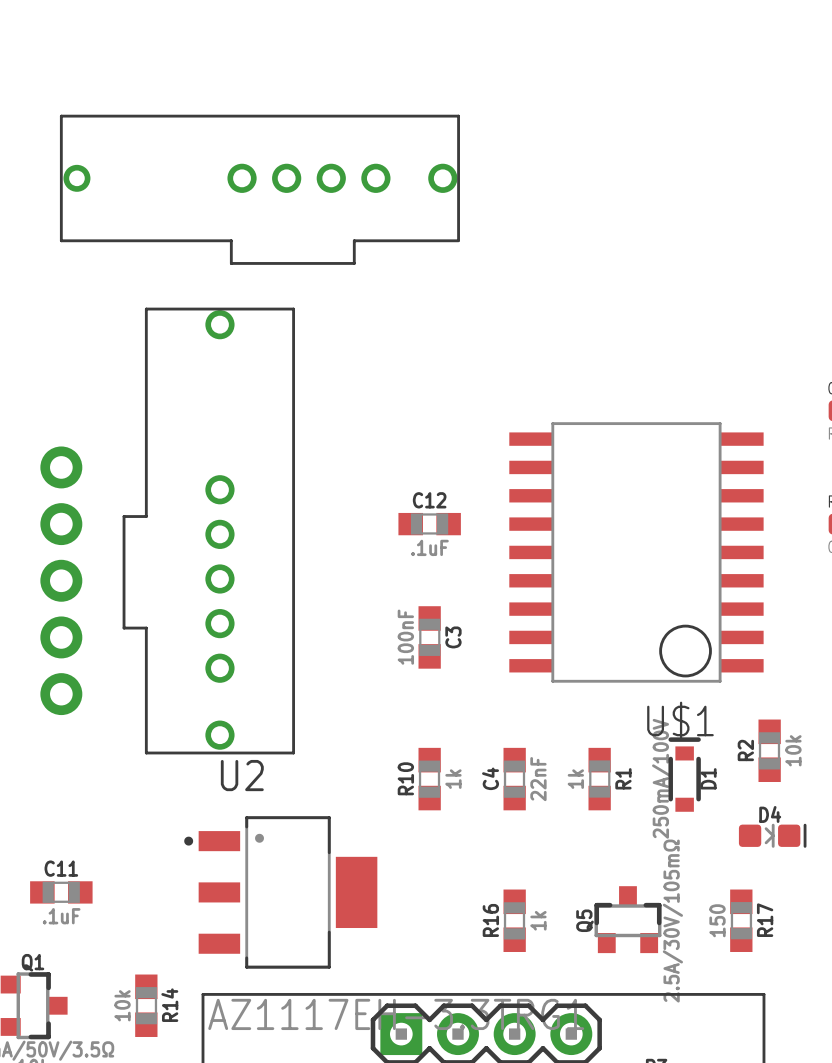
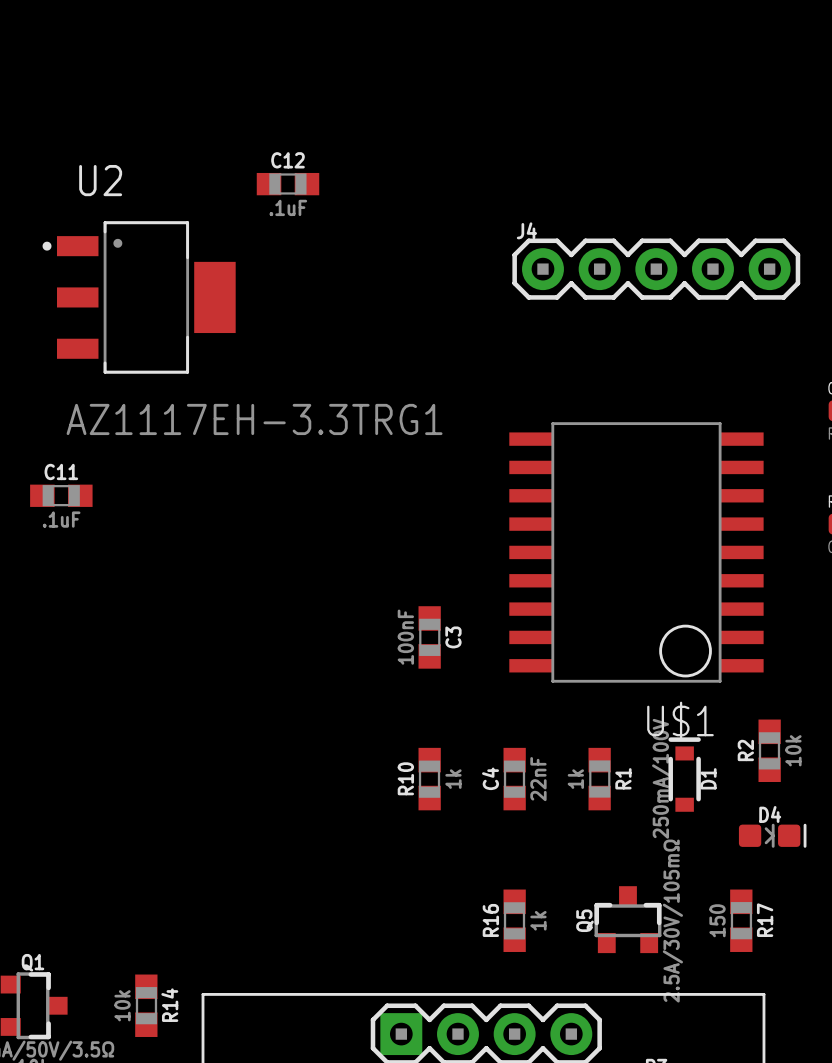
part: (259, 189) -> none
J4: none -> (656, 269)
C12 position: (429, 524) -> (288, 184)
part: (208, 531) -> none
part: (61, 580) -> none
C11 position: (61, 892) -> (61, 495)
U2 position: (280, 892) -> (139, 297)

